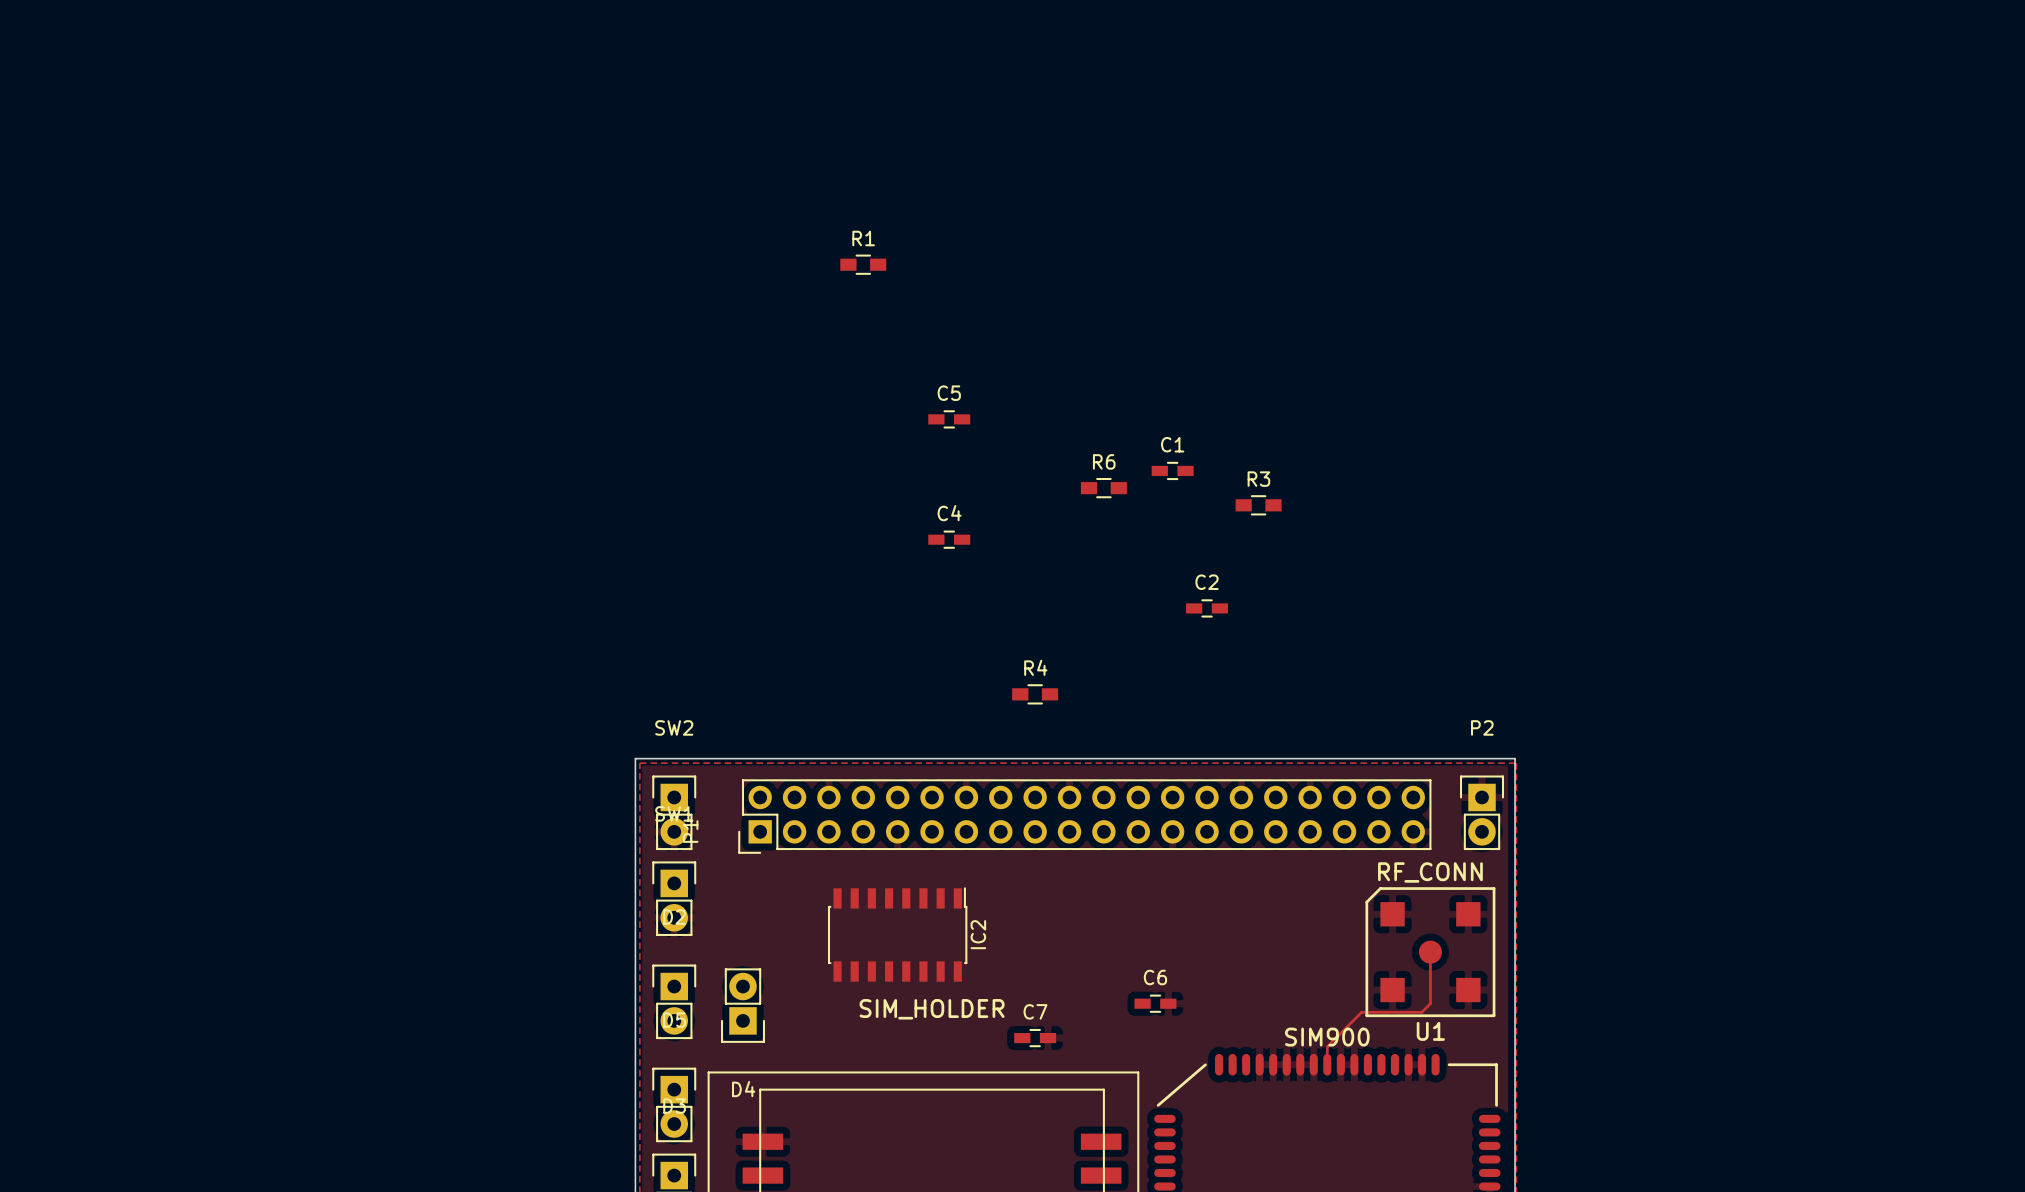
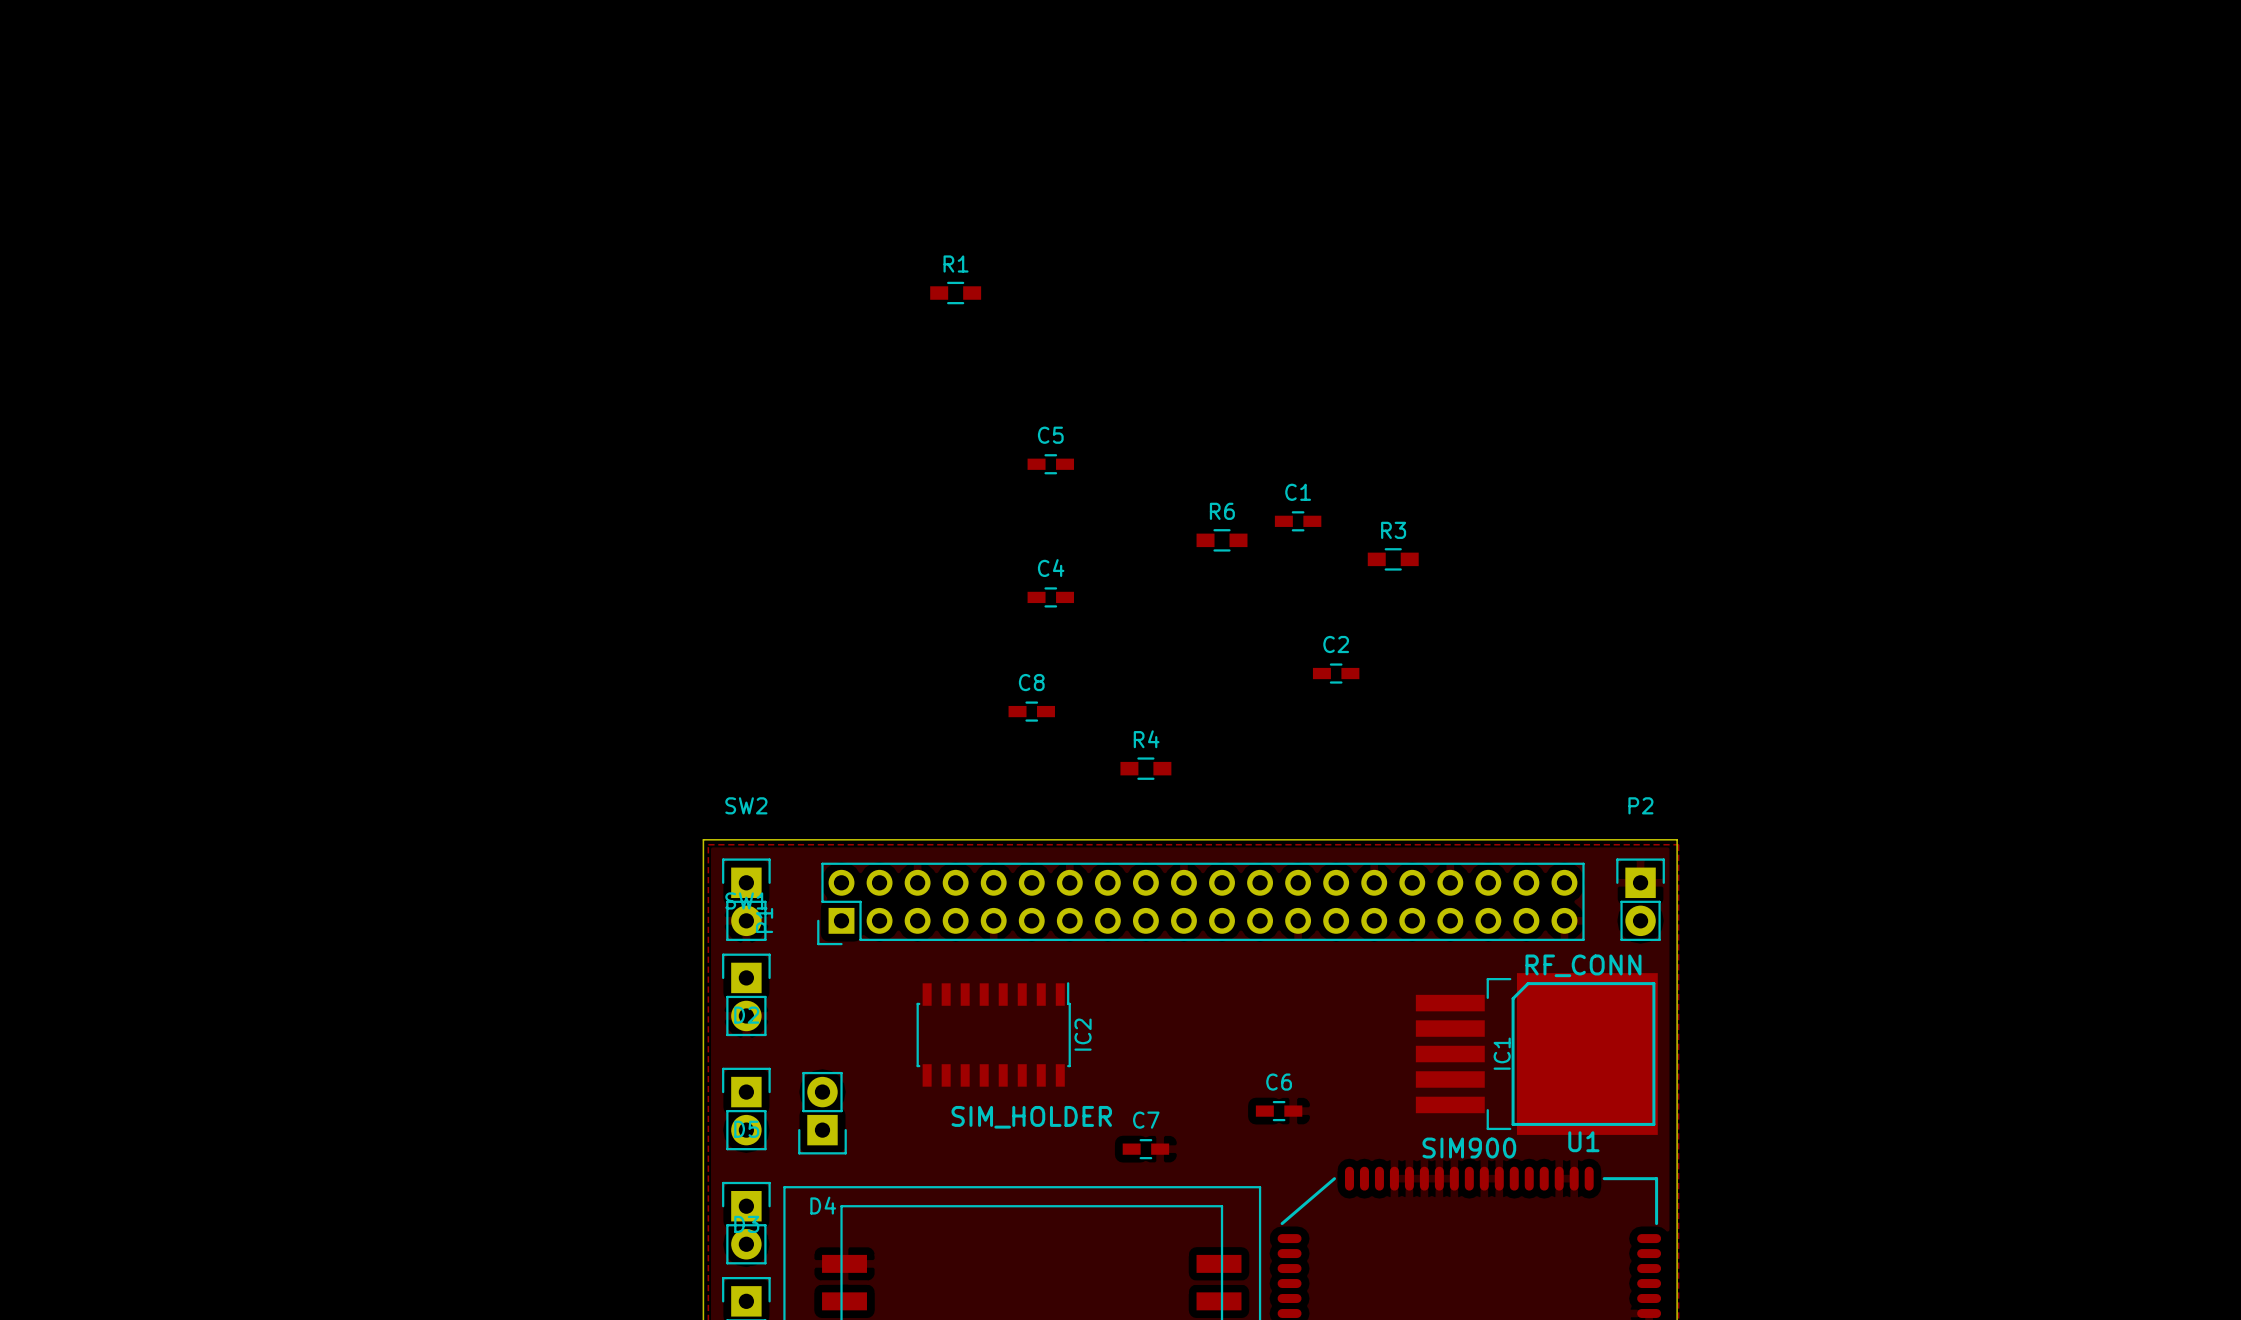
C8: none -> (1031, 711)
IC1: none -> (1536, 1054)
track: (1430, 952) (1430, 1003) (1421, 1012) (1361, 1012) (1327, 1046) (1327, 1064) -> none

